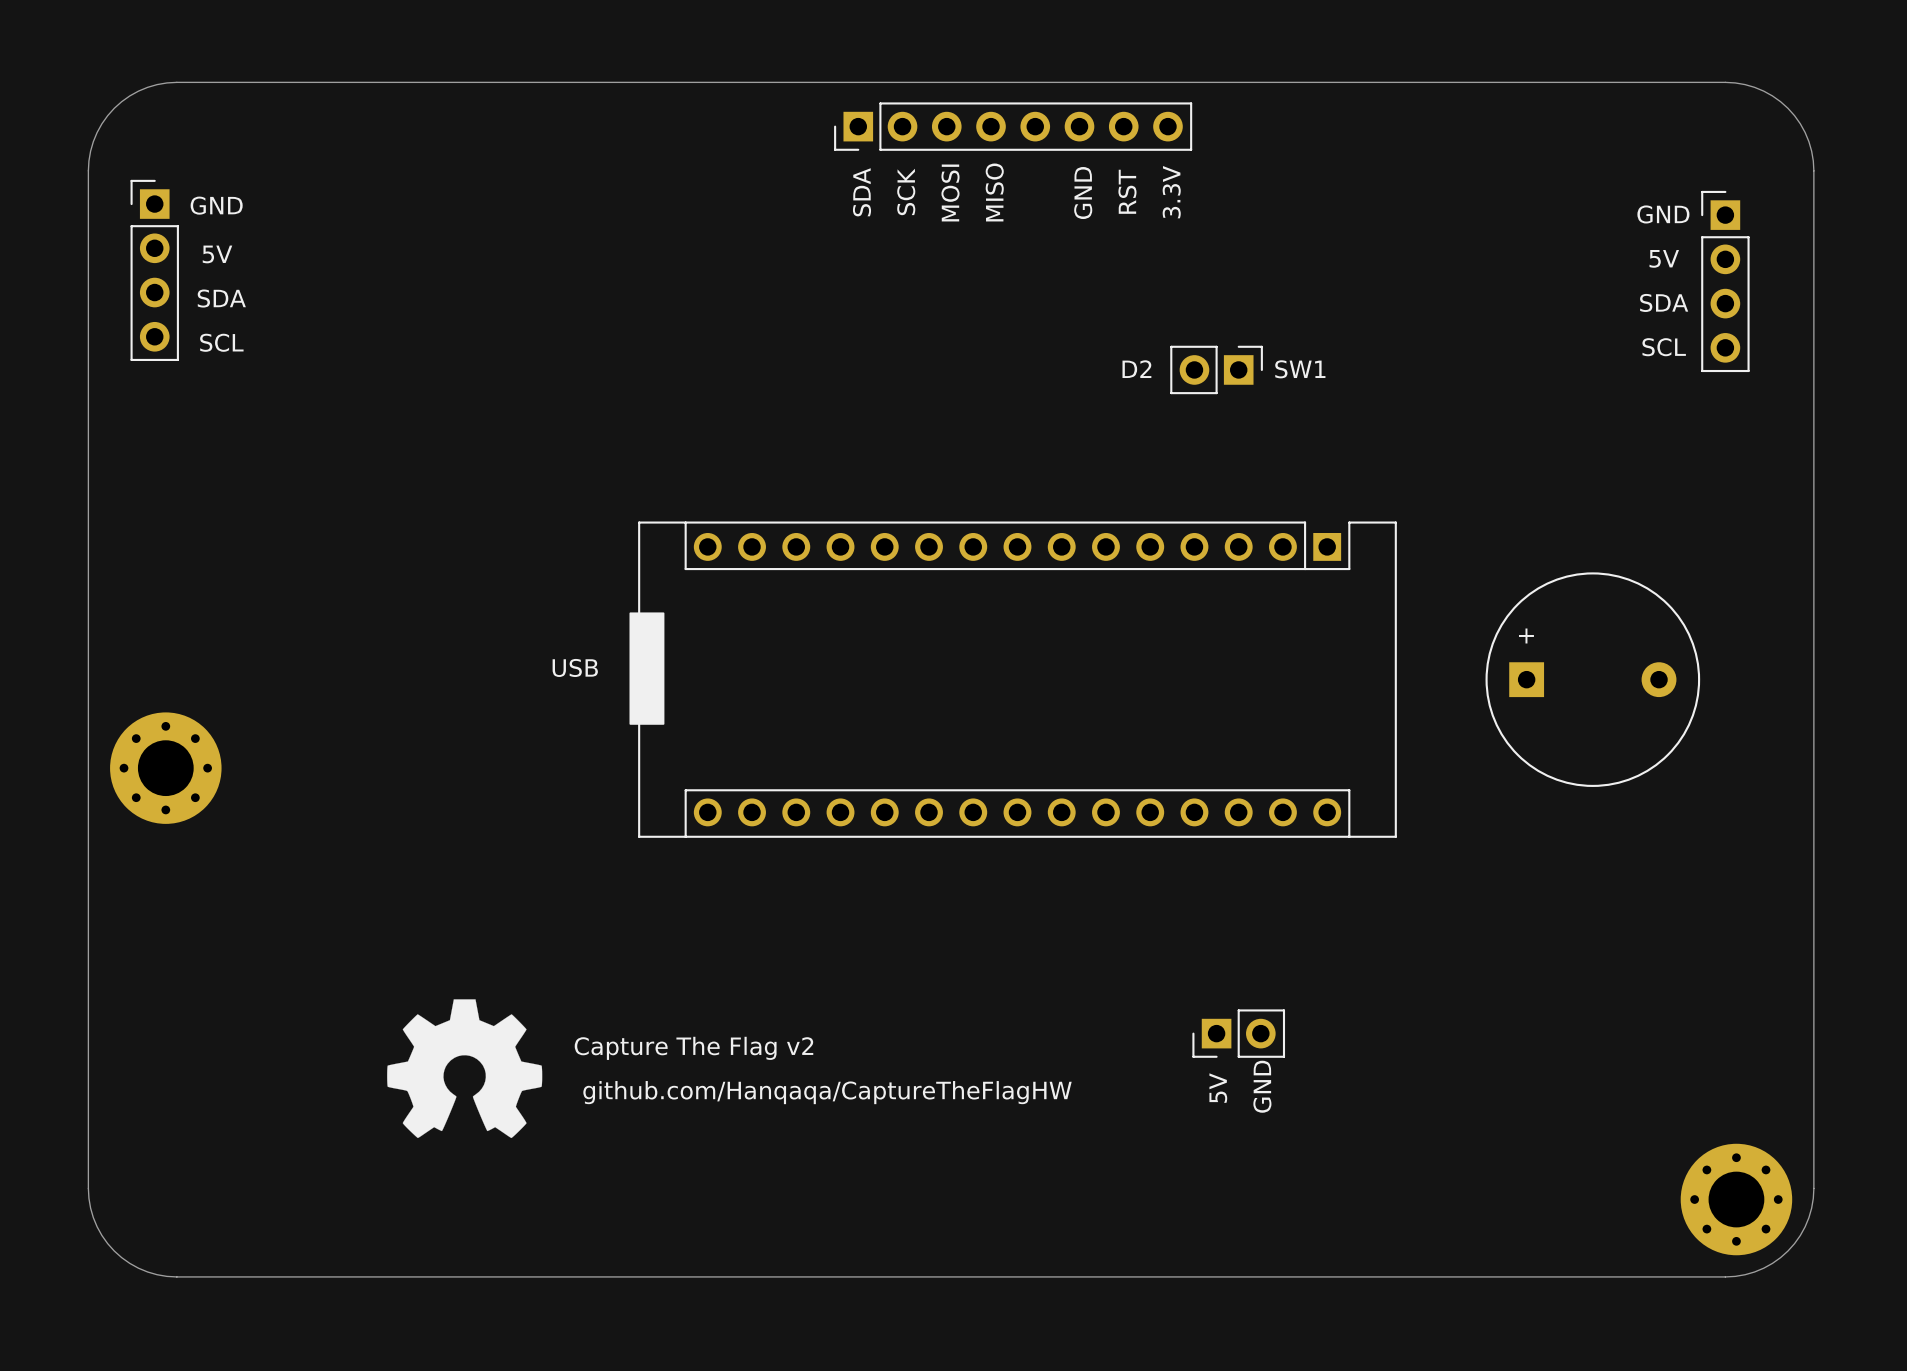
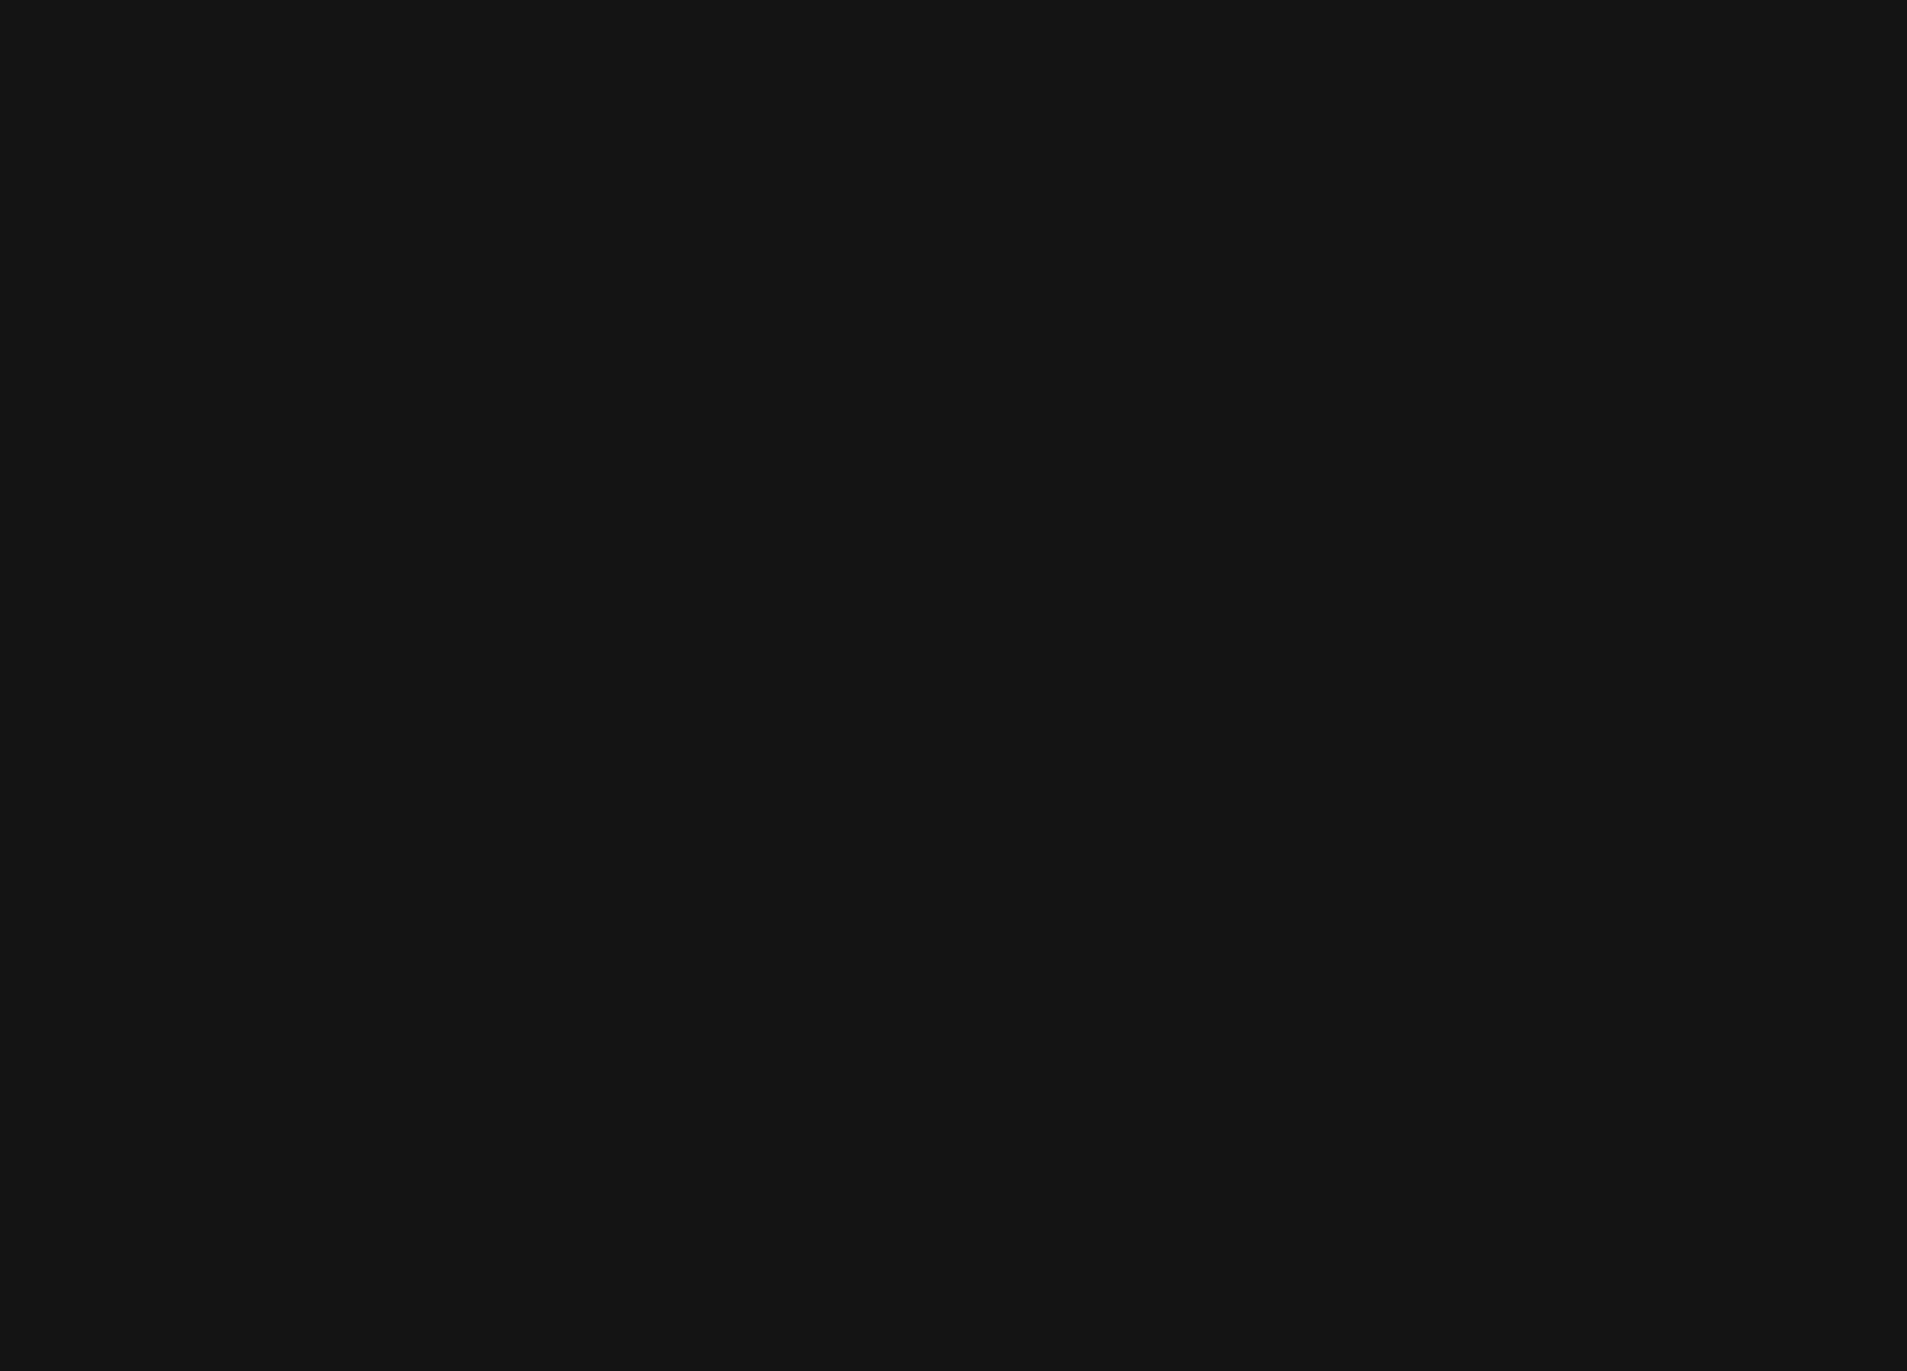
board edge: (176, 82) (1725, 82) (1754, 87) (1780, 101) (1794, 115) (1805, 132) (1811, 151) (1813, 170) (1813, 1188) (1808, 1217) (1794, 1243) (1780, 1257) (1763, 1268) (1745, 1274) (1725, 1276) (176, 1276) (147, 1271) (121, 1257) (107, 1243) (97, 1226) (90, 1208) (88, 1188) (88, 170) (90, 151) (97, 132) (114, 108) (138, 91) (157, 84) (176, 82) -> none
part: (1013, 126) -> none
text: SCK (906, 191) -> none
text: RST (1127, 191) -> none
text: SDA (862, 192) -> none
text: MOSI (950, 192) -> none
text: MISO (994, 192) -> none
text: 3.3V (1171, 192) -> none
text: GND (1083, 193) -> none
text: GND (216, 205) -> none
text: GND (1663, 214) -> none
text: 5V (217, 254) -> none
text: 5V (1664, 258) -> none
part: (154, 270) -> none
part: (1725, 281) -> none
text: SDA (221, 298) -> none
text: SDA (1664, 302) -> none
text: SCL (221, 342) -> none
text: SCL (1664, 347) -> none
text: D2 (1136, 369) -> none
SW1: (1216, 369) -> none
drawing: [629, 612, 665, 725] -> none
text: USB (575, 667) -> none
part: (1017, 679) -> none
part: (1592, 679) -> none
part: (165, 768) -> none
drawing: [387, 999, 543, 1139] -> none
part: (1238, 1033) -> none
text: Capture The Flag v2 (693, 1048) -> none
text: GND (1262, 1086) -> none
text: 5V (1218, 1088) -> none
text: github.com/Hanqaqa/CaptureTheFlagHW (827, 1092) -> none
part: (1736, 1199) -> none

